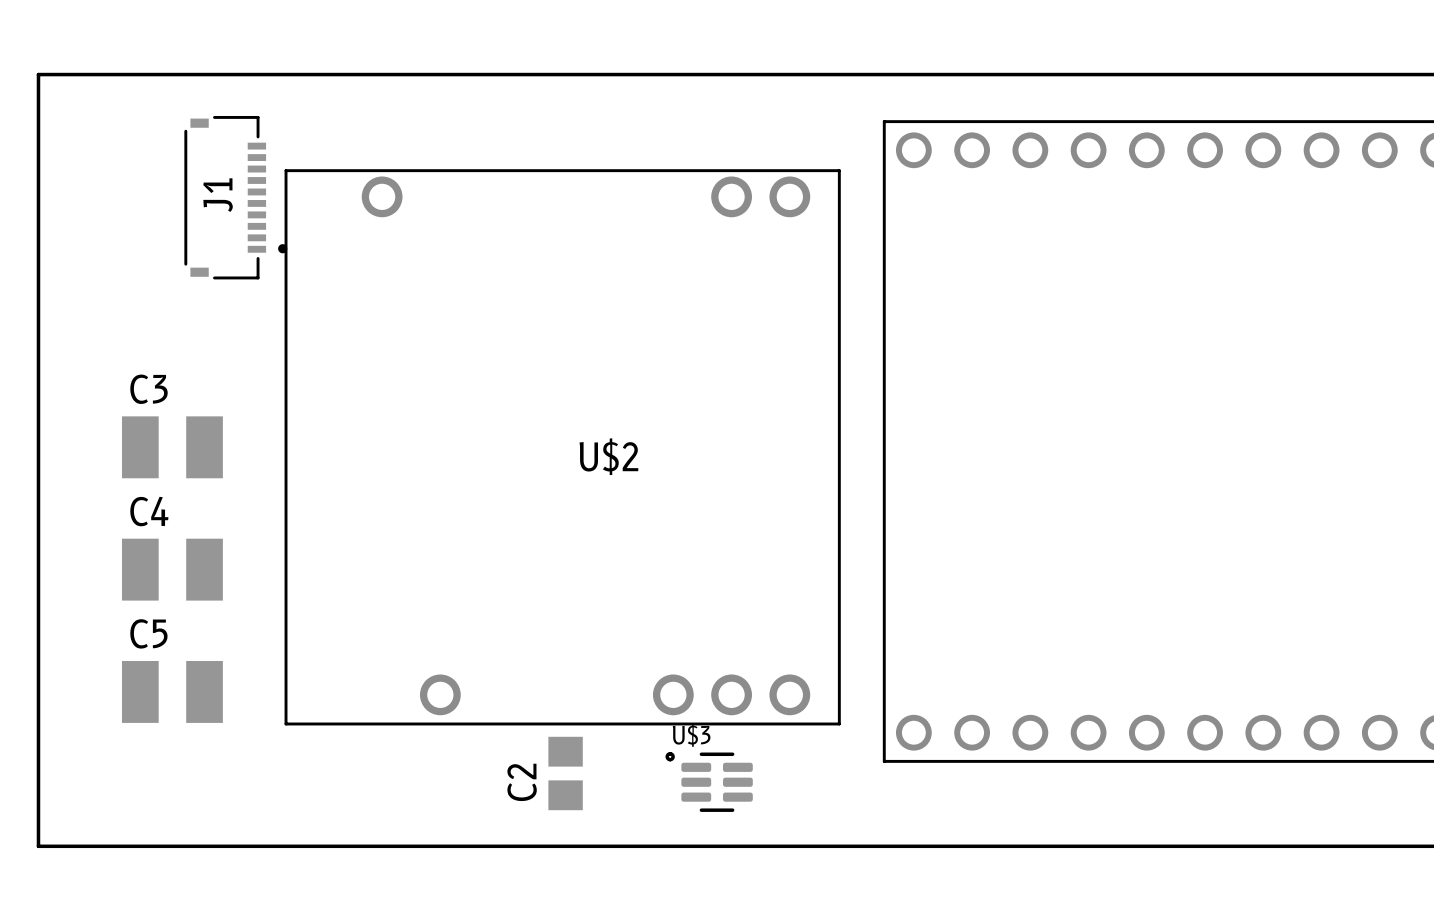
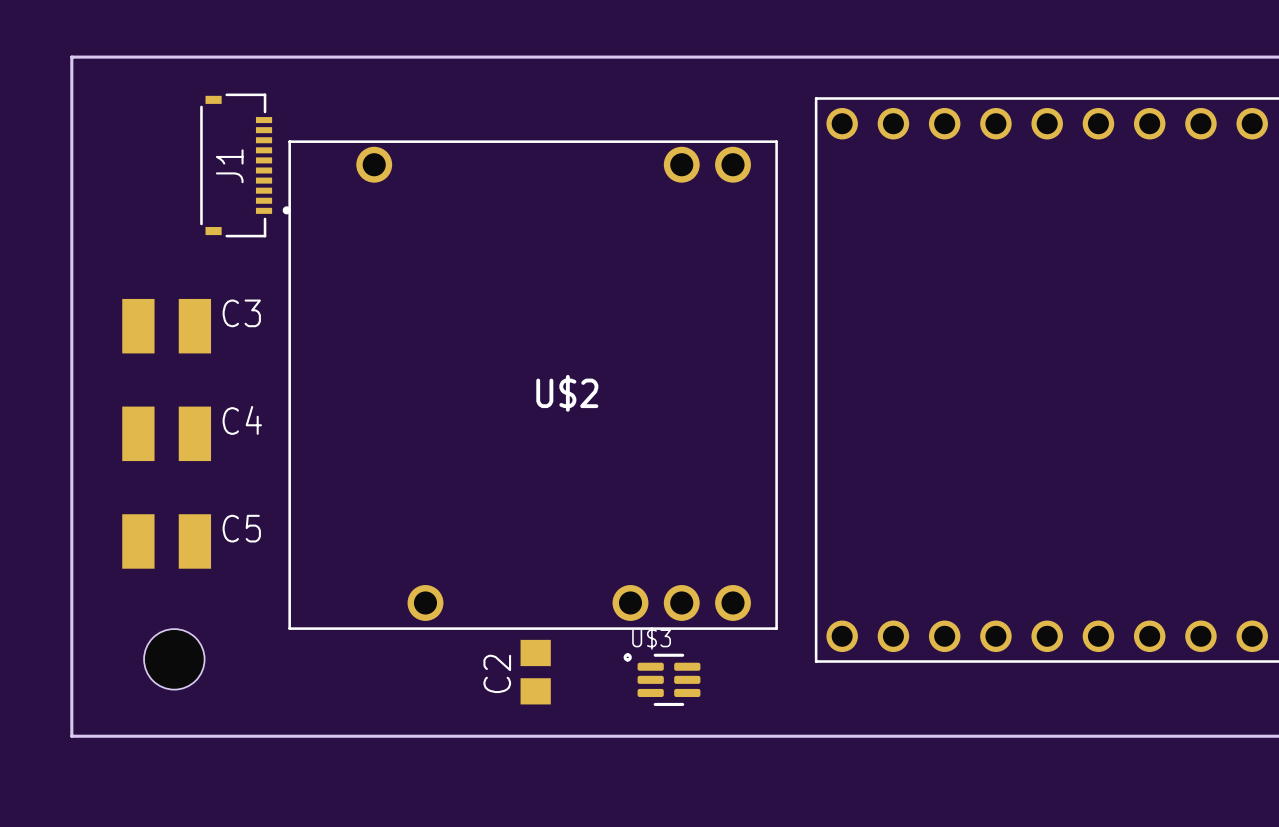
C3 name position: C3 (148, 389) -> C3 (241, 313)
C3 position: (172, 447) -> (166, 326)
C4 name position: C4 (149, 511) -> C4 (242, 420)
C4 position: (172, 569) -> (166, 433)
C5 name position: C5 (148, 633) -> C5 (241, 528)
C5 position: (172, 691) -> (166, 541)
hole: none -> (174, 659)

